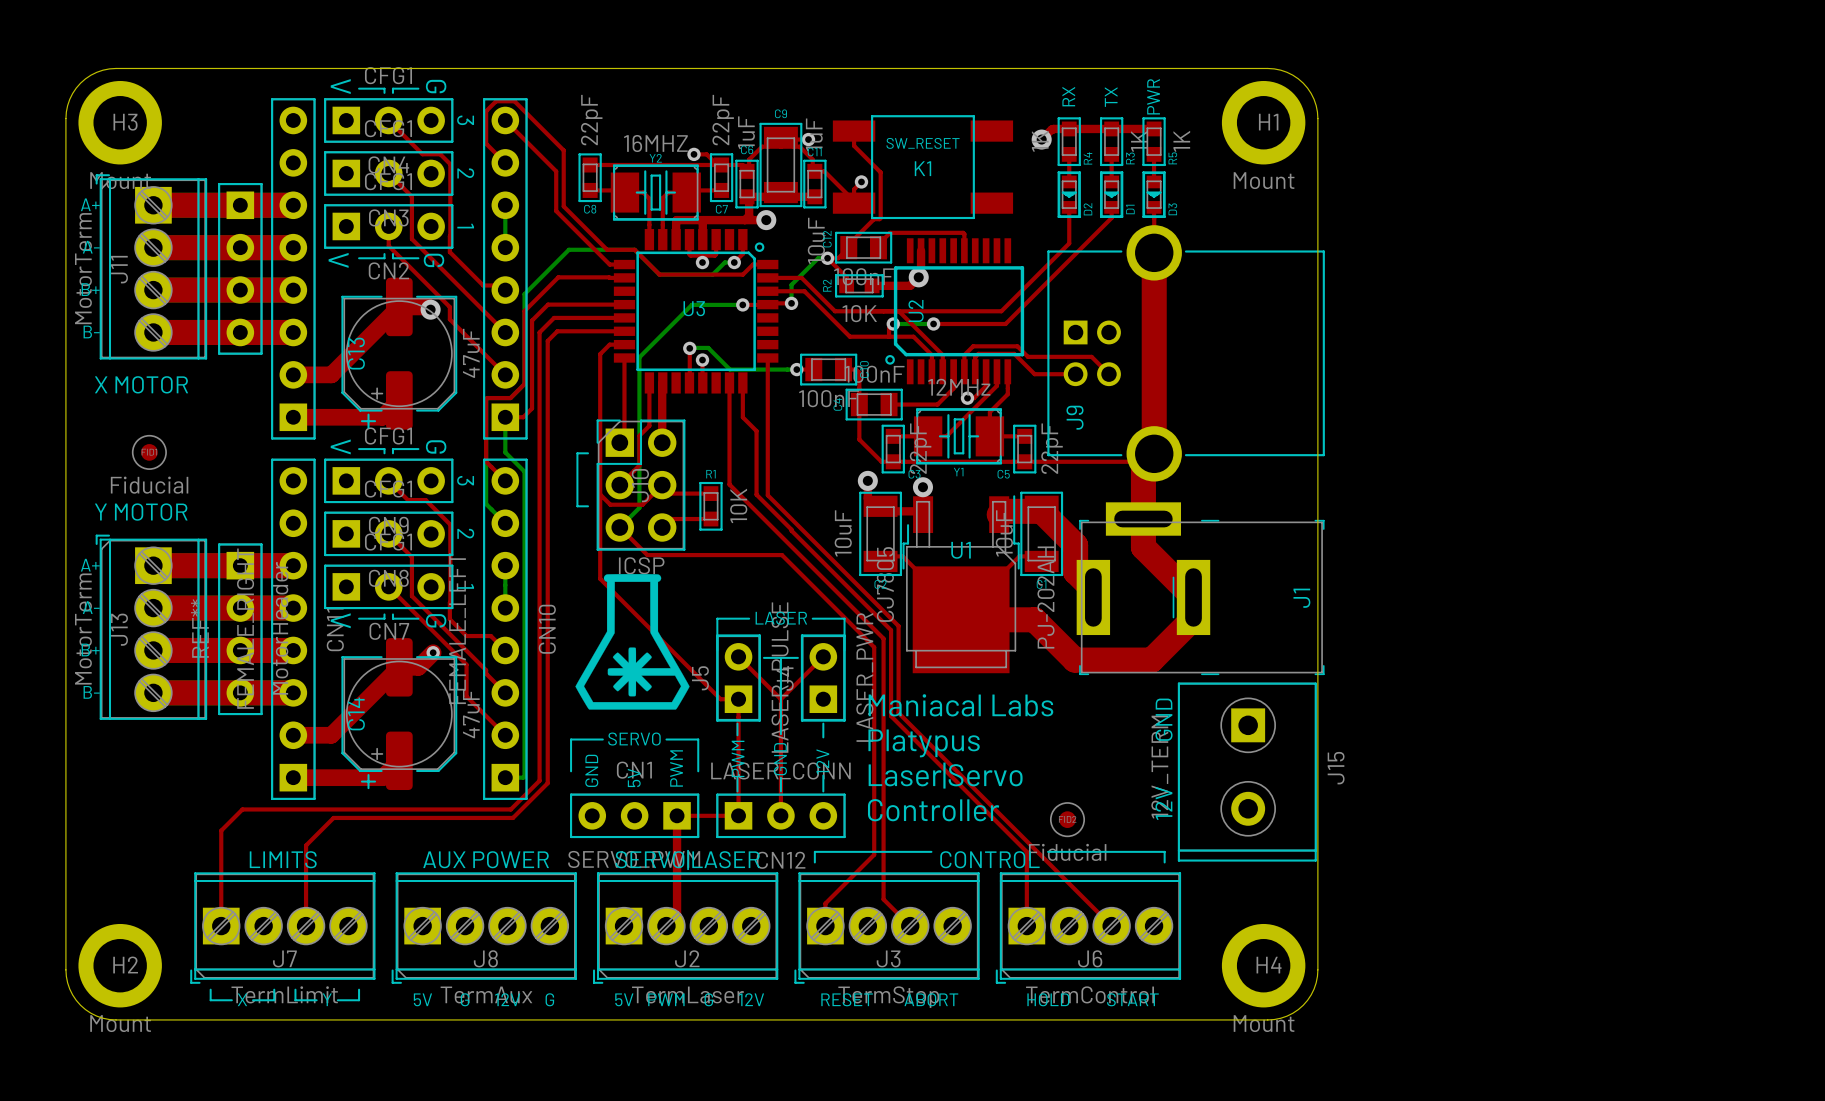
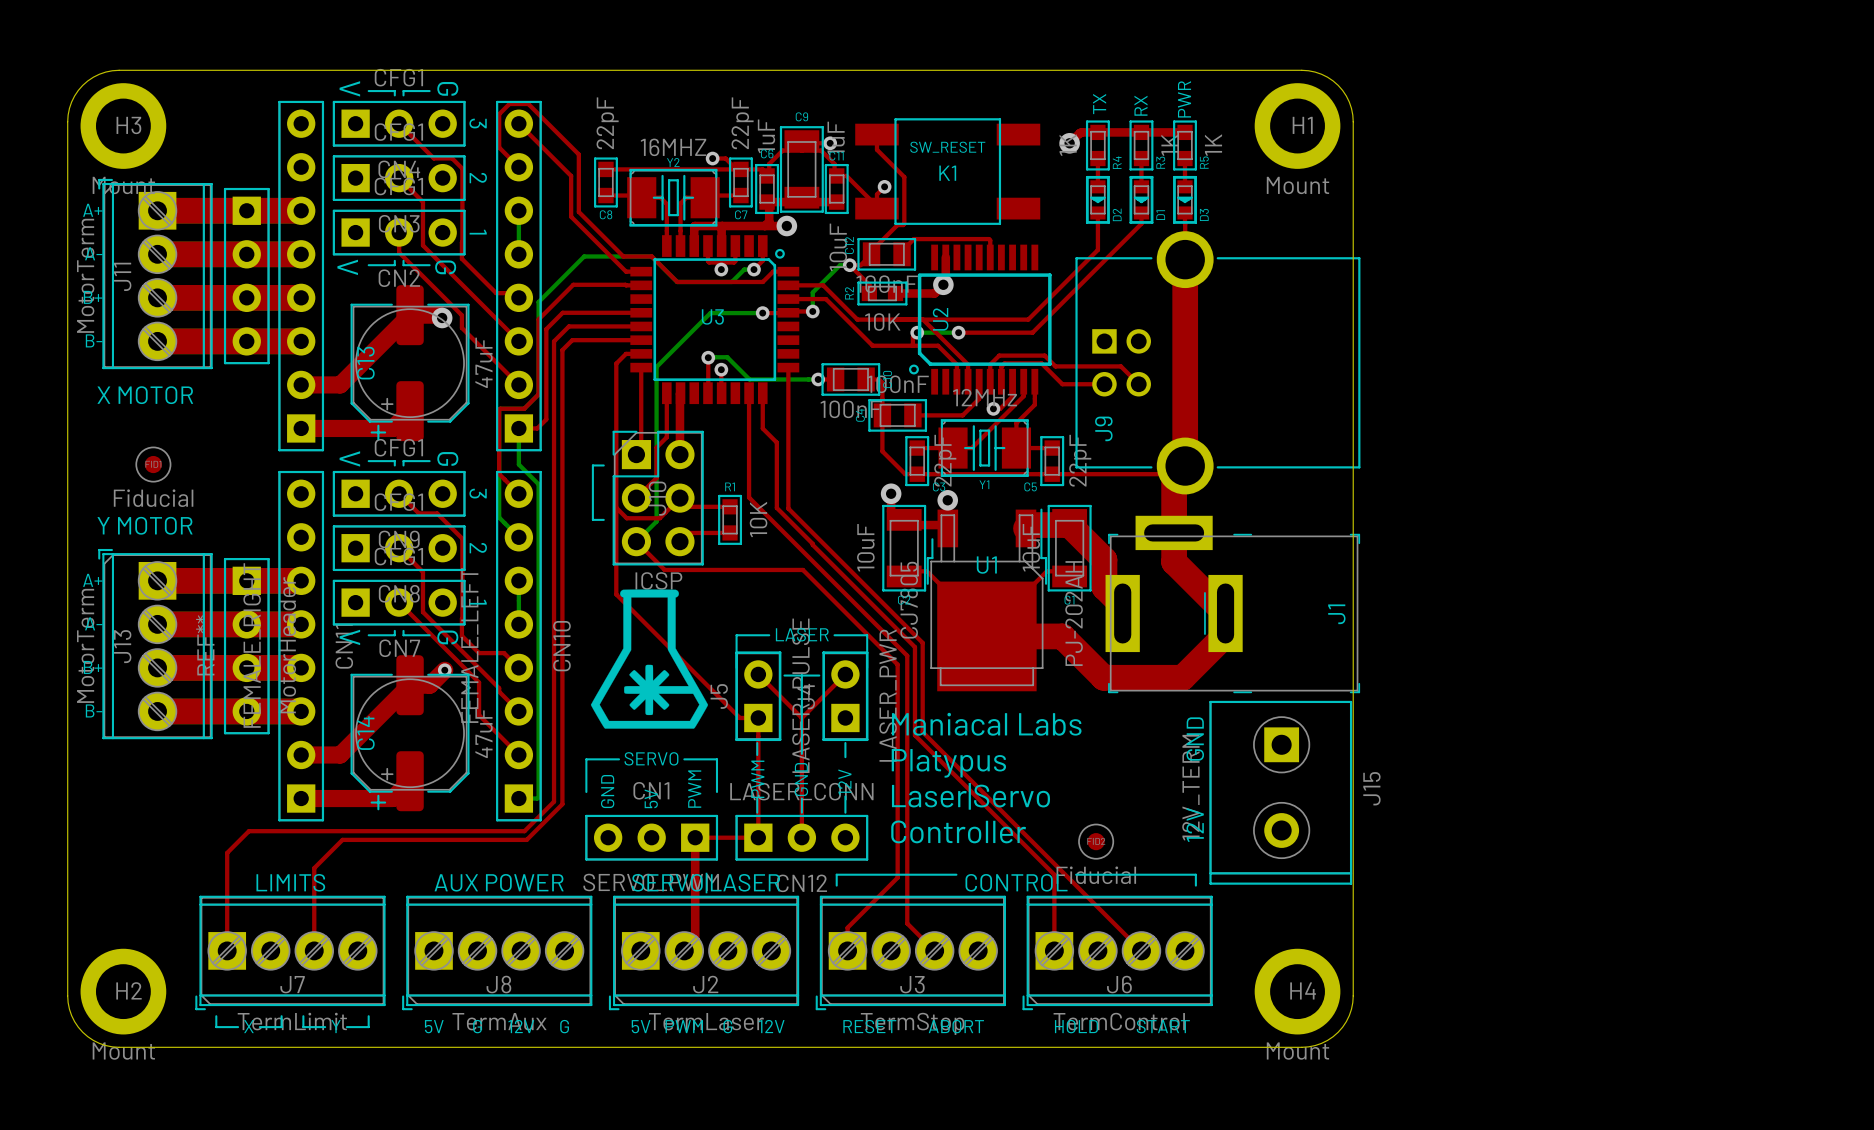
text: RX (1068, 96) -> TX (1099, 104)
text: TX (1111, 97) -> RX (1140, 105)

